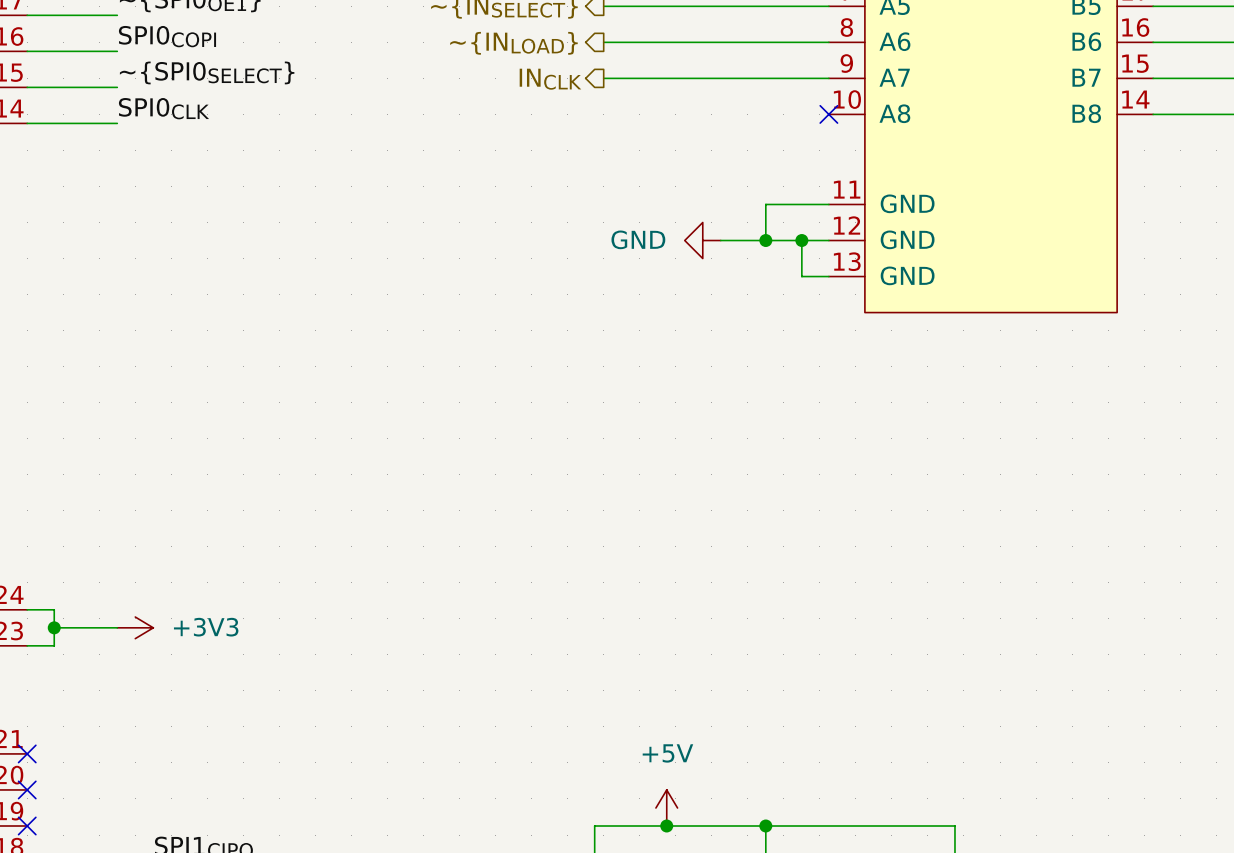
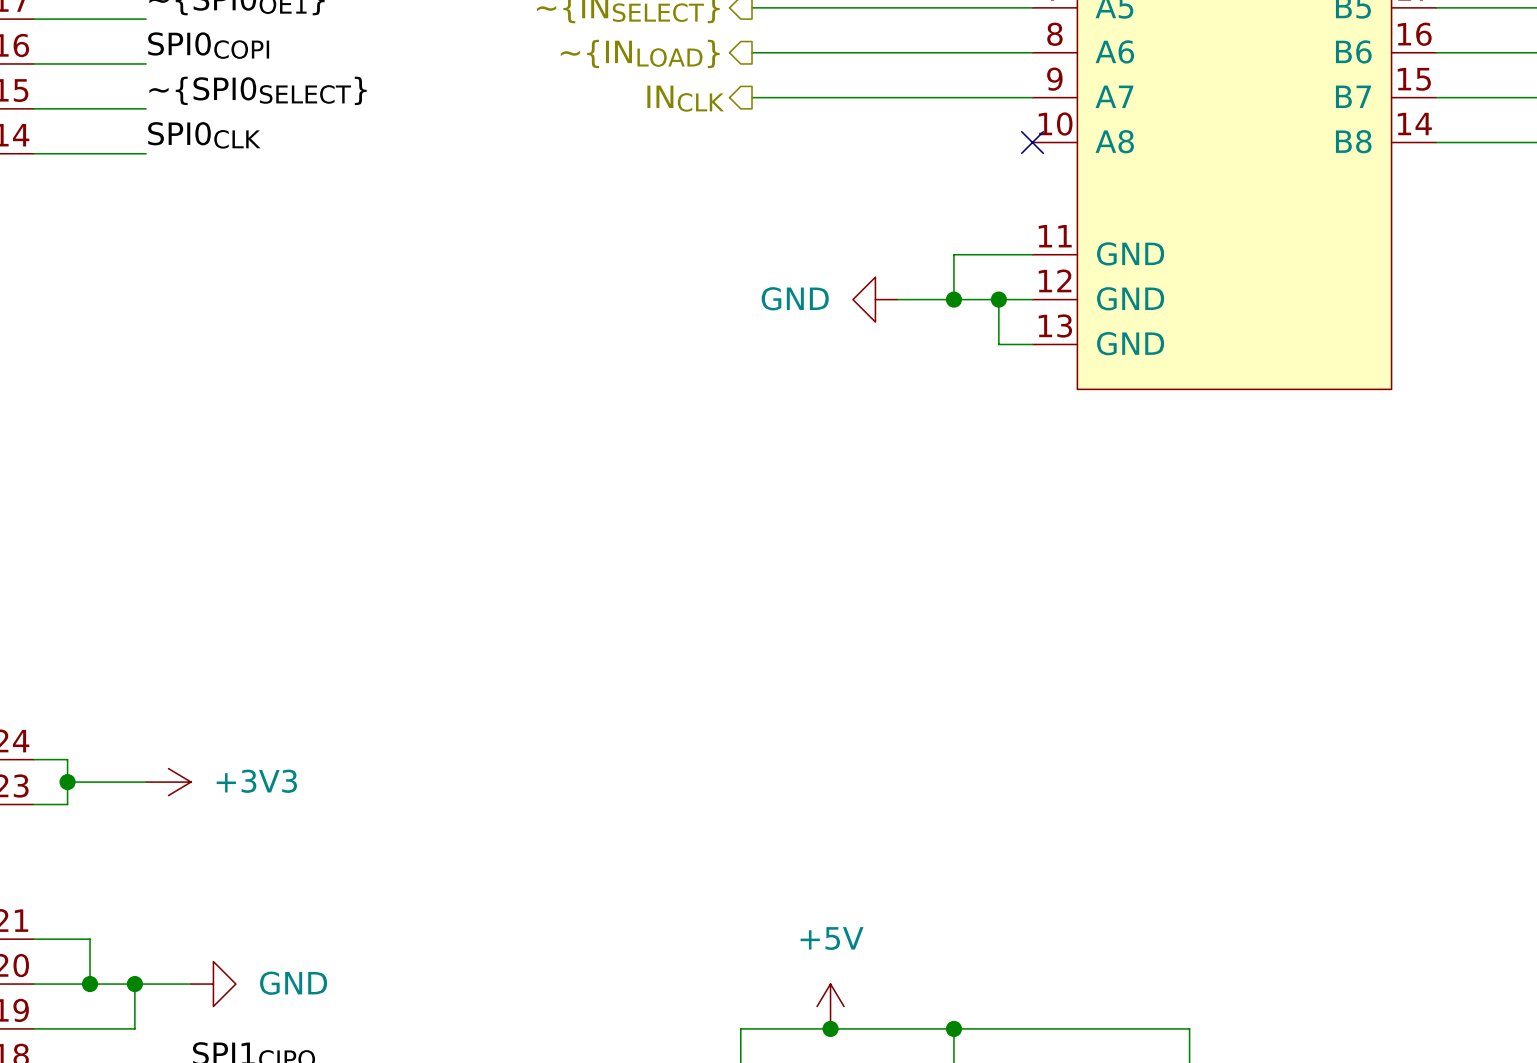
wire: none -> (33, 939) (90, 939) (90, 984)
no-connect mark: (27, 753) -> none
wire: none -> (33, 984) (190, 984)
no-connect mark: (27, 789) -> none
junction: none -> (90, 984)
wire: none -> (134, 984) (134, 1028) (33, 1028)
junction: none -> (134, 984)
power symbol: none -> GND (213, 984)
no-connect mark: (27, 826) -> none

